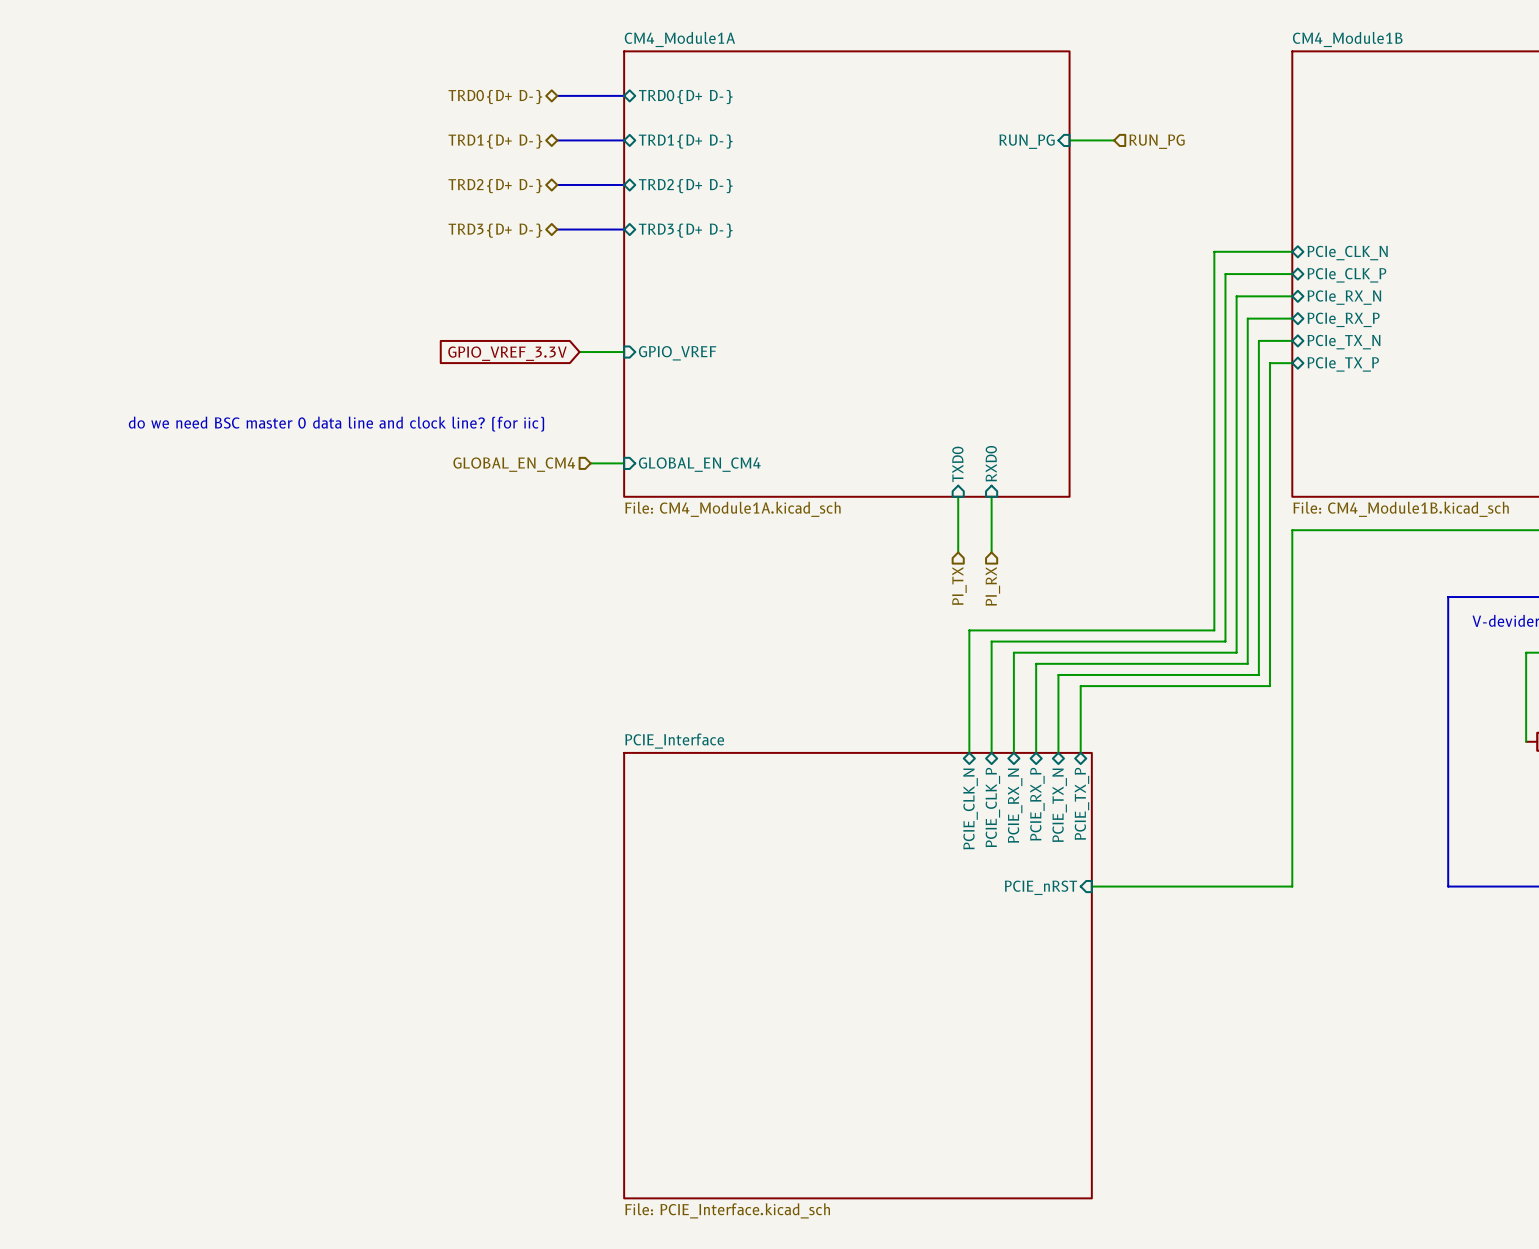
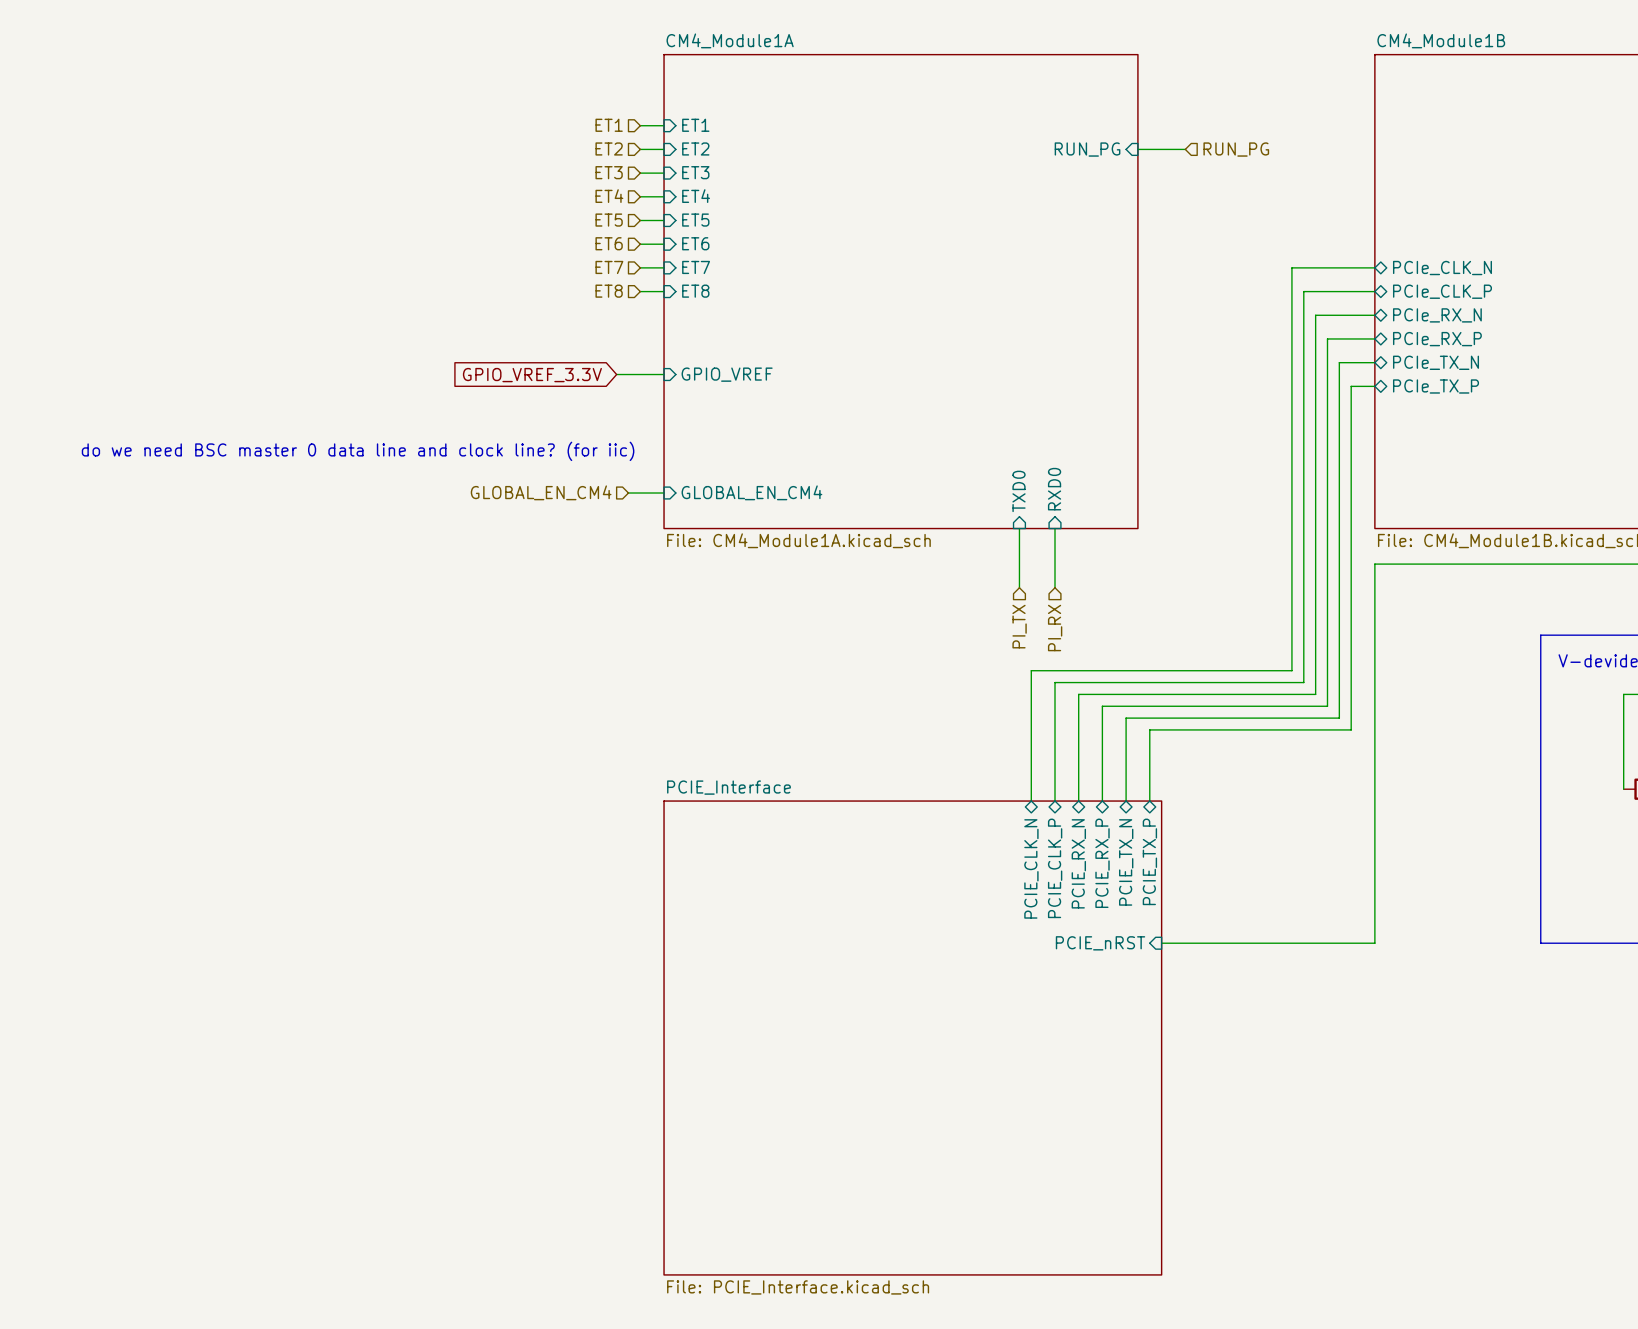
bus: (557, 95) (624, 95) -> none
hierarchical label: TRD0{D+ D-} (495, 97) -> none
sheet pin: TRD0{D+ D-} (685, 97) -> none
hierarchical label: none -> ET1 (609, 125)
sheet pin: none -> ET1 (695, 125)
wire: none -> (640, 125) (664, 125)
bus: (557, 140) (624, 140) -> none
hierarchical label: none -> ET2 (609, 148)
hierarchical label: TRD1{D+ D-} (495, 141) -> none
sheet pin shape: bidirectional (685, 141) -> input (695, 148)
sheet pin: TRD1{D+ D-} (685, 141) -> ET2 (695, 148)
hierarchical label: none -> ET3 (609, 172)
wire: none -> (640, 173) (664, 173)
sheet pin: none -> ET3 (695, 172)
bus: (557, 184) (624, 184) -> none
hierarchical label: none -> ET4 (609, 196)
hierarchical label: TRD2{D+ D-} (495, 186) -> none
sheet pin shape: bidirectional (685, 186) -> input (696, 196)
sheet pin: TRD2{D+ D-} (685, 186) -> ET4 (696, 196)
hierarchical label: none -> ET5 (609, 220)
sheet pin: none -> ET5 (695, 220)
wire: none -> (640, 220) (664, 220)
bus: (557, 229) (624, 229) -> none
hierarchical label: none -> ET6 (609, 243)
hierarchical label: TRD3{D+ D-} (495, 230) -> none
sheet pin shape: bidirectional (685, 230) -> input (695, 243)
sheet pin: TRD3{D+ D-} (685, 230) -> ET6 (695, 243)
hierarchical label: none -> ET7 (609, 267)
wire: none -> (640, 267) (664, 267)
sheet pin: none -> ET7 (696, 267)
hierarchical label: none -> ET8 (609, 291)
sheet pin: none -> ET8 (695, 291)
wire: none -> (640, 291) (664, 291)

